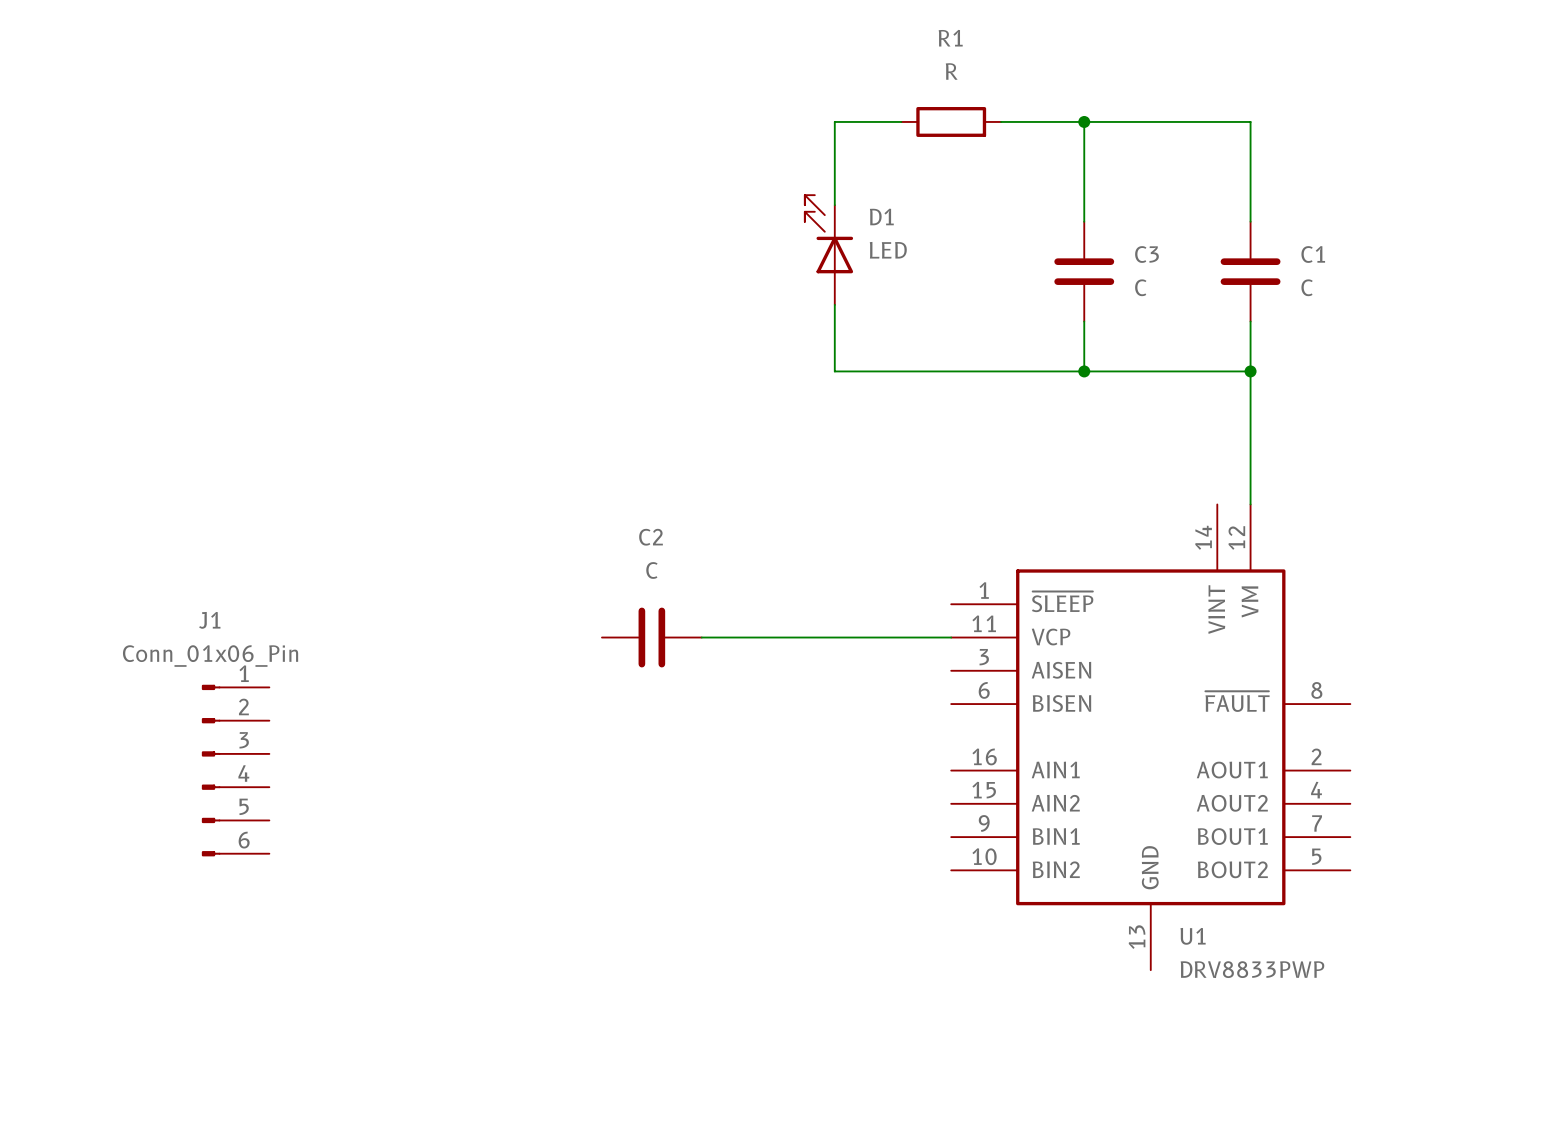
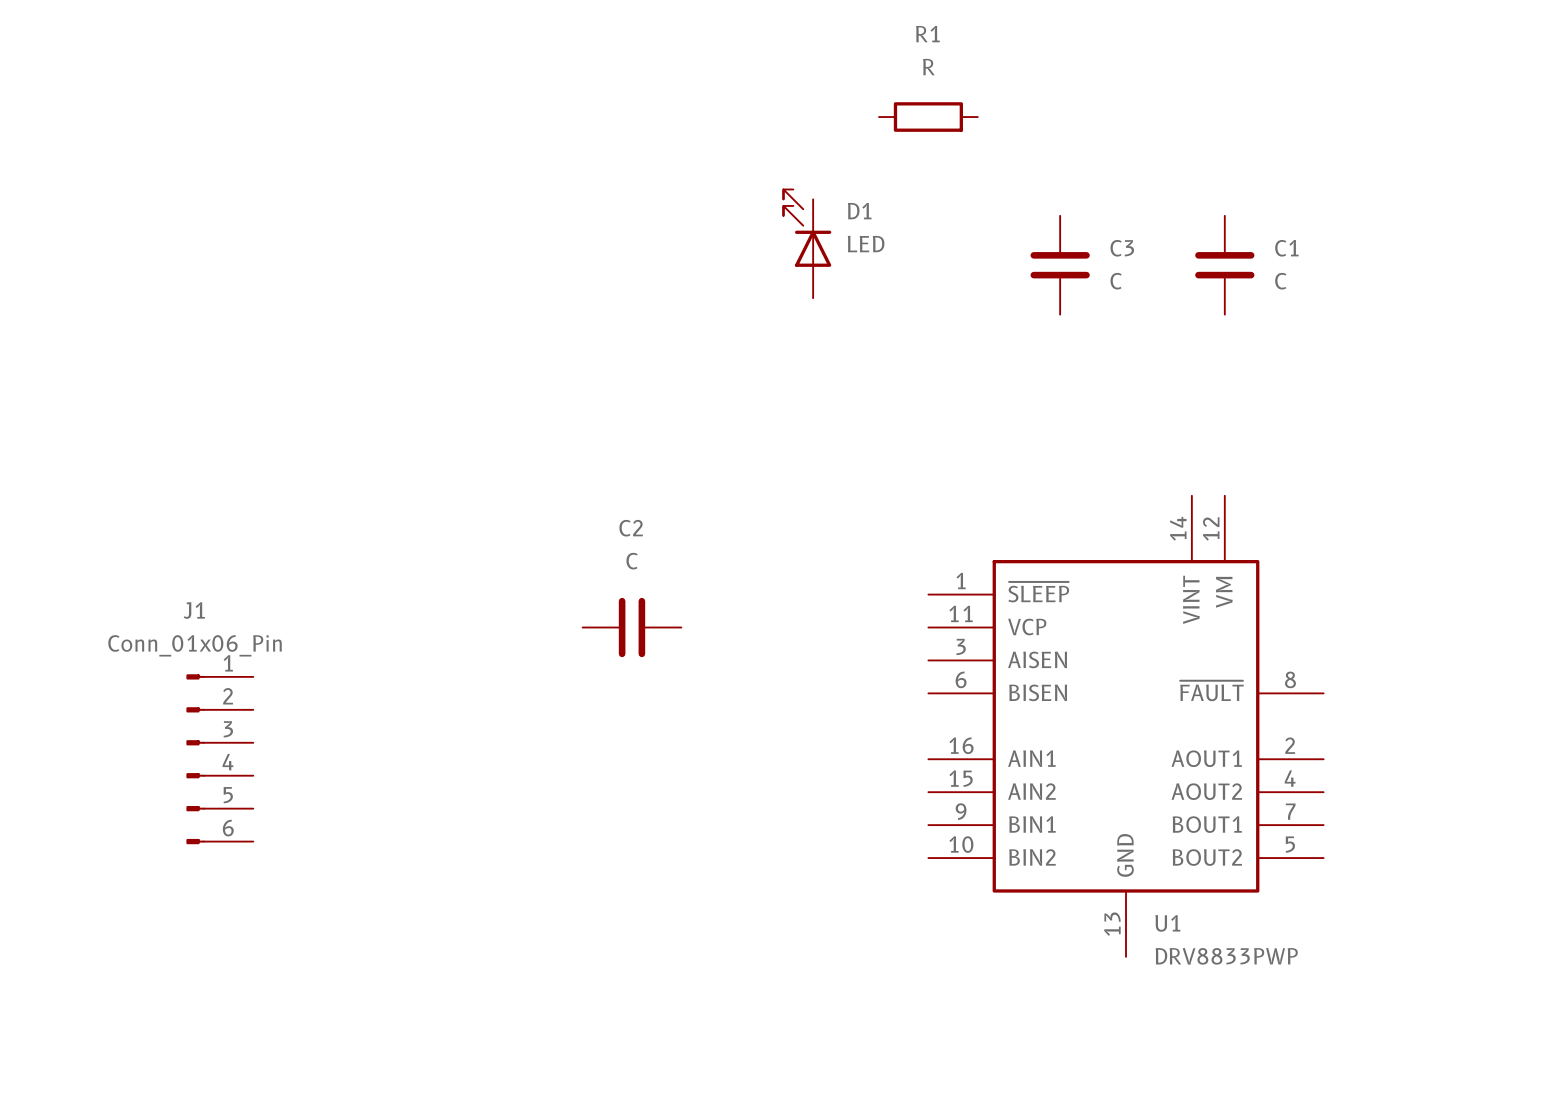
wire: (901, 121) (834, 121) (834, 205) -> none
wire: (1001, 121) (1250, 121) (1250, 221) -> none
wire: (1084, 121) (1084, 221) -> none
junction: (1084, 121) -> none
wire: (834, 304) (834, 371) (1250, 371) -> none
wire: (1084, 321) (1084, 371) -> none
wire: (1250, 321) (1250, 504) -> none
junction: (1084, 371) -> none
junction: (1250, 371) -> none
wire: (701, 637) (951, 637) -> none

